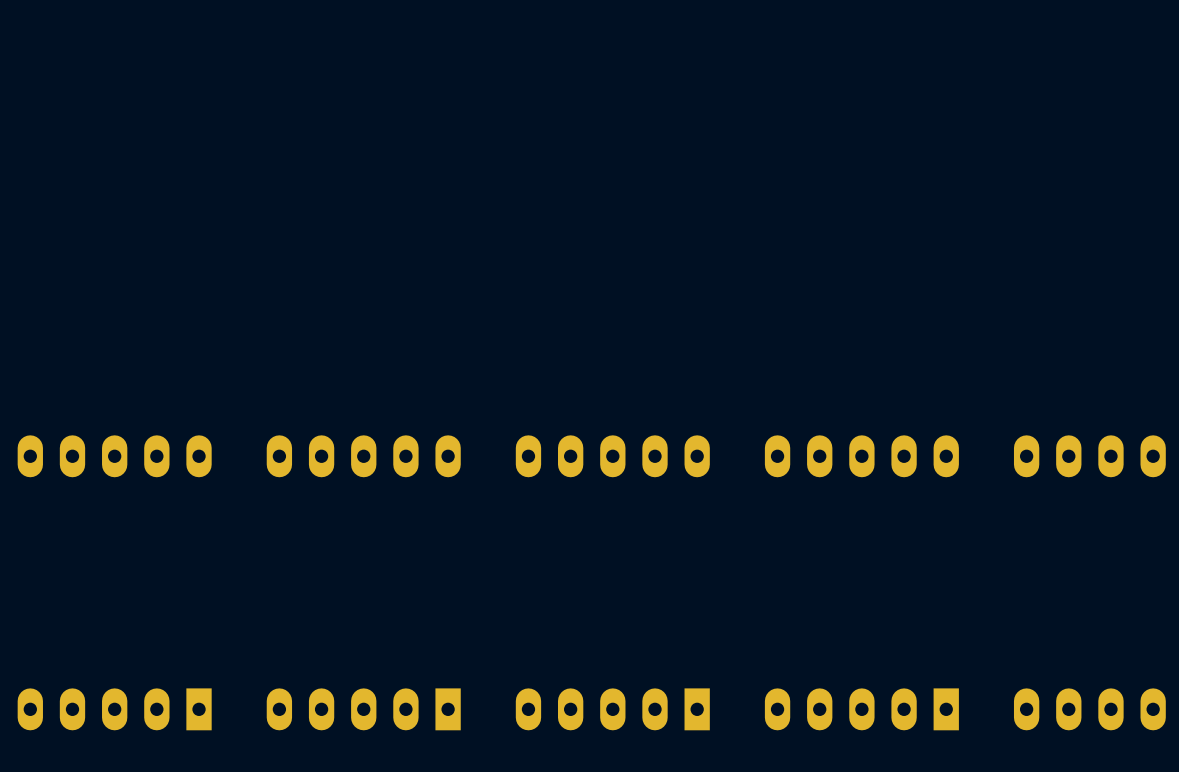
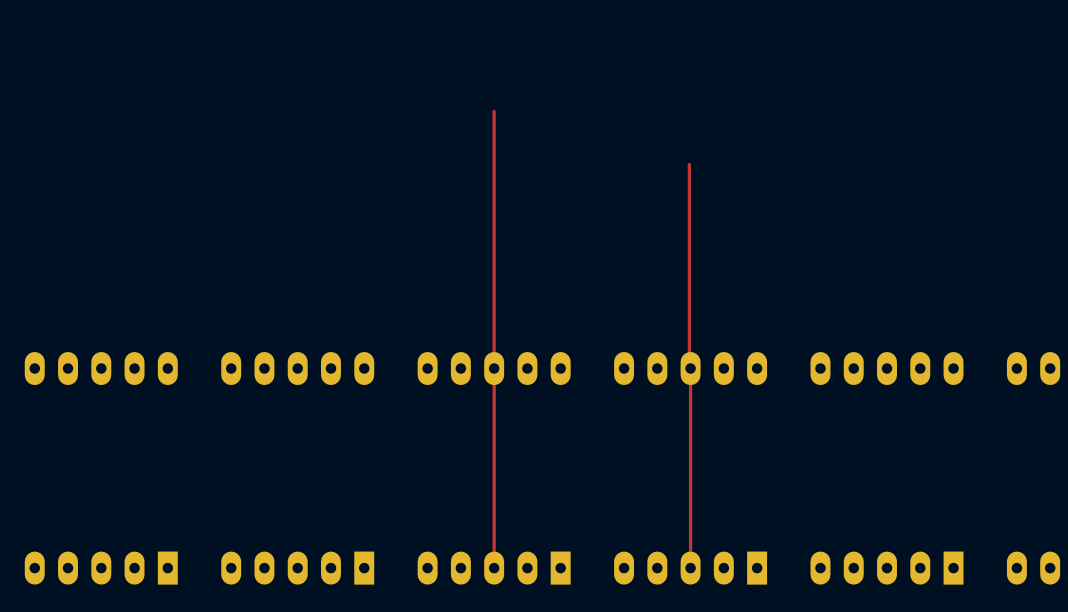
track: none -> (494, 111) (494, 368)
track: none -> (689, 164) (690, 568)
track: none -> (494, 368) (494, 568)

